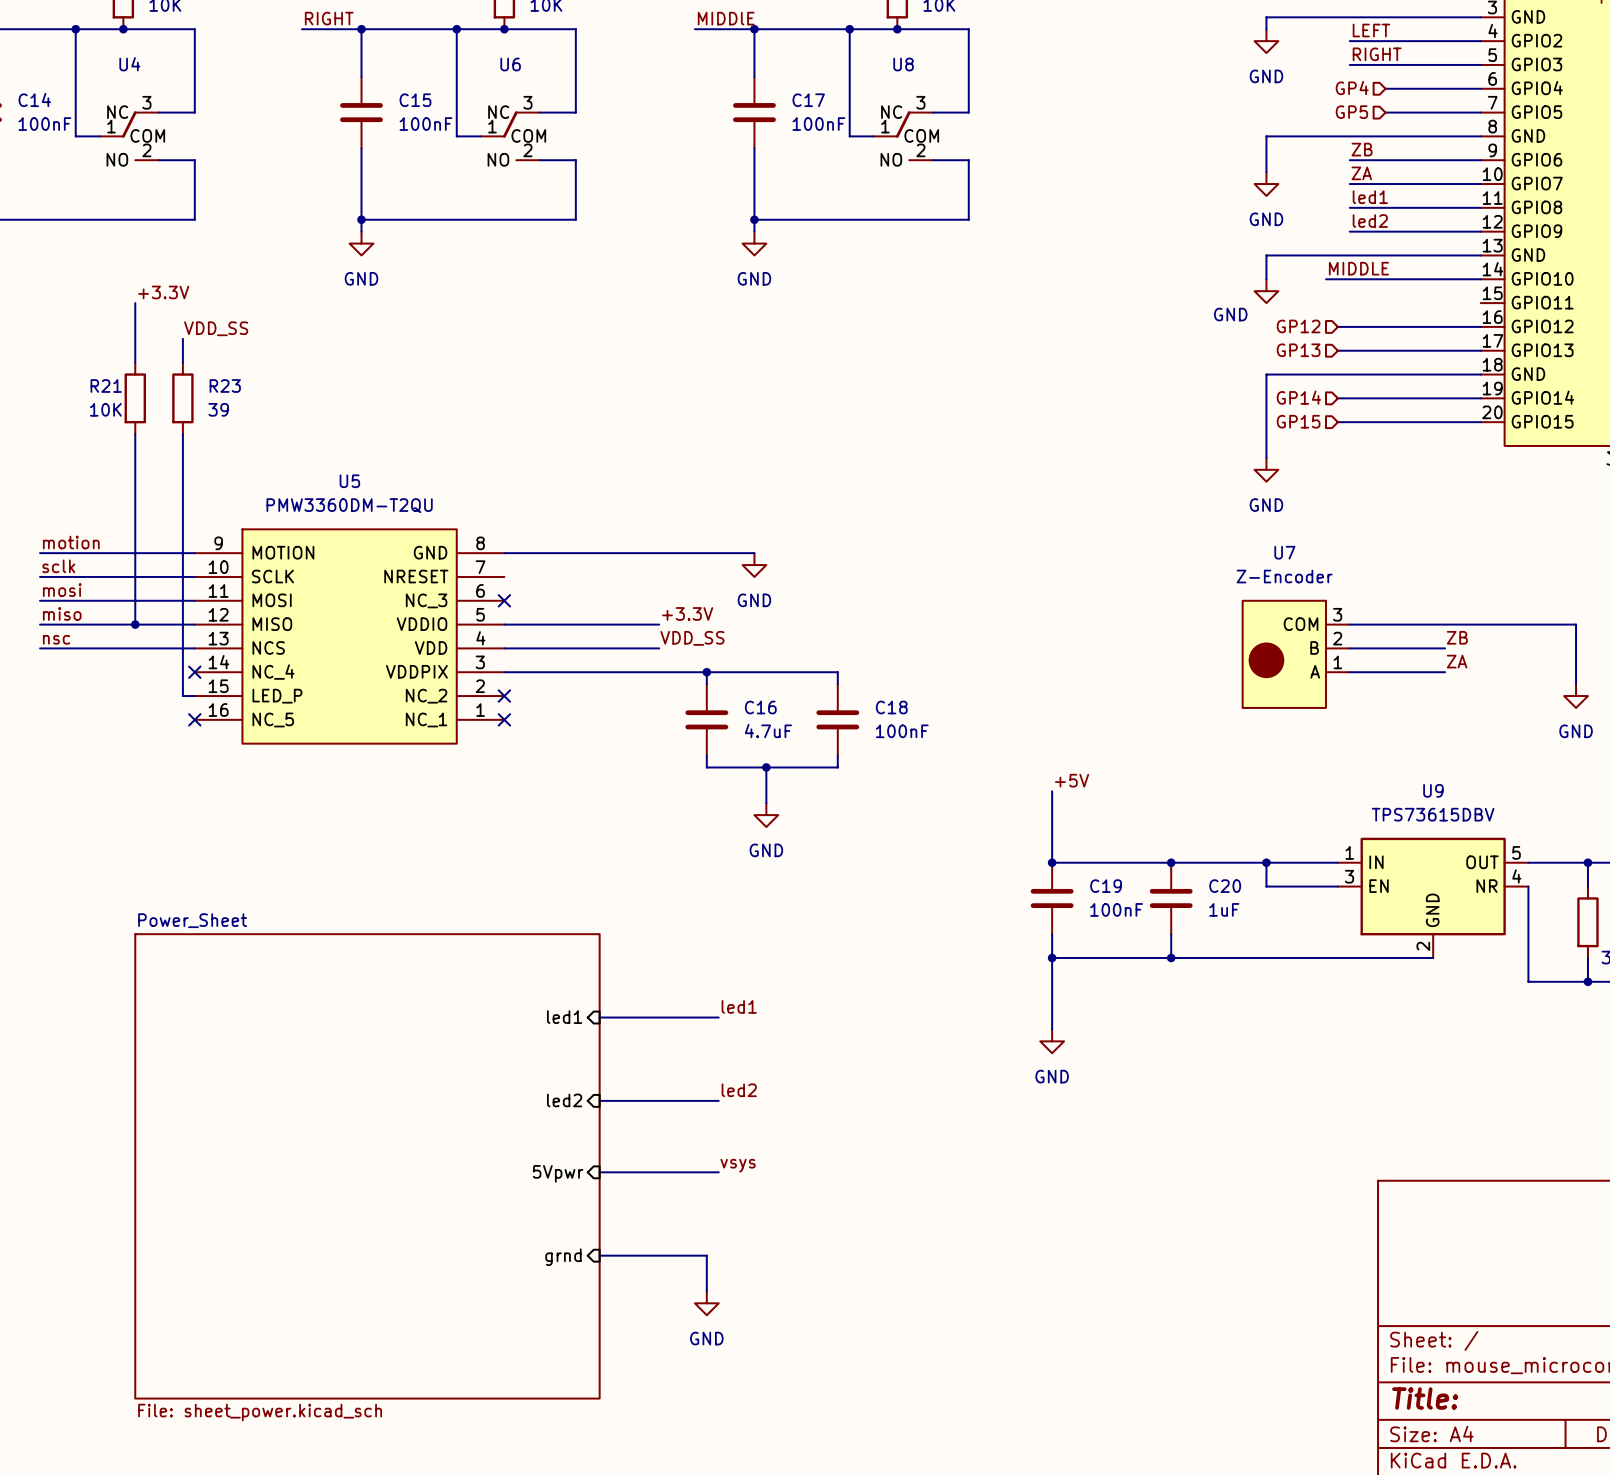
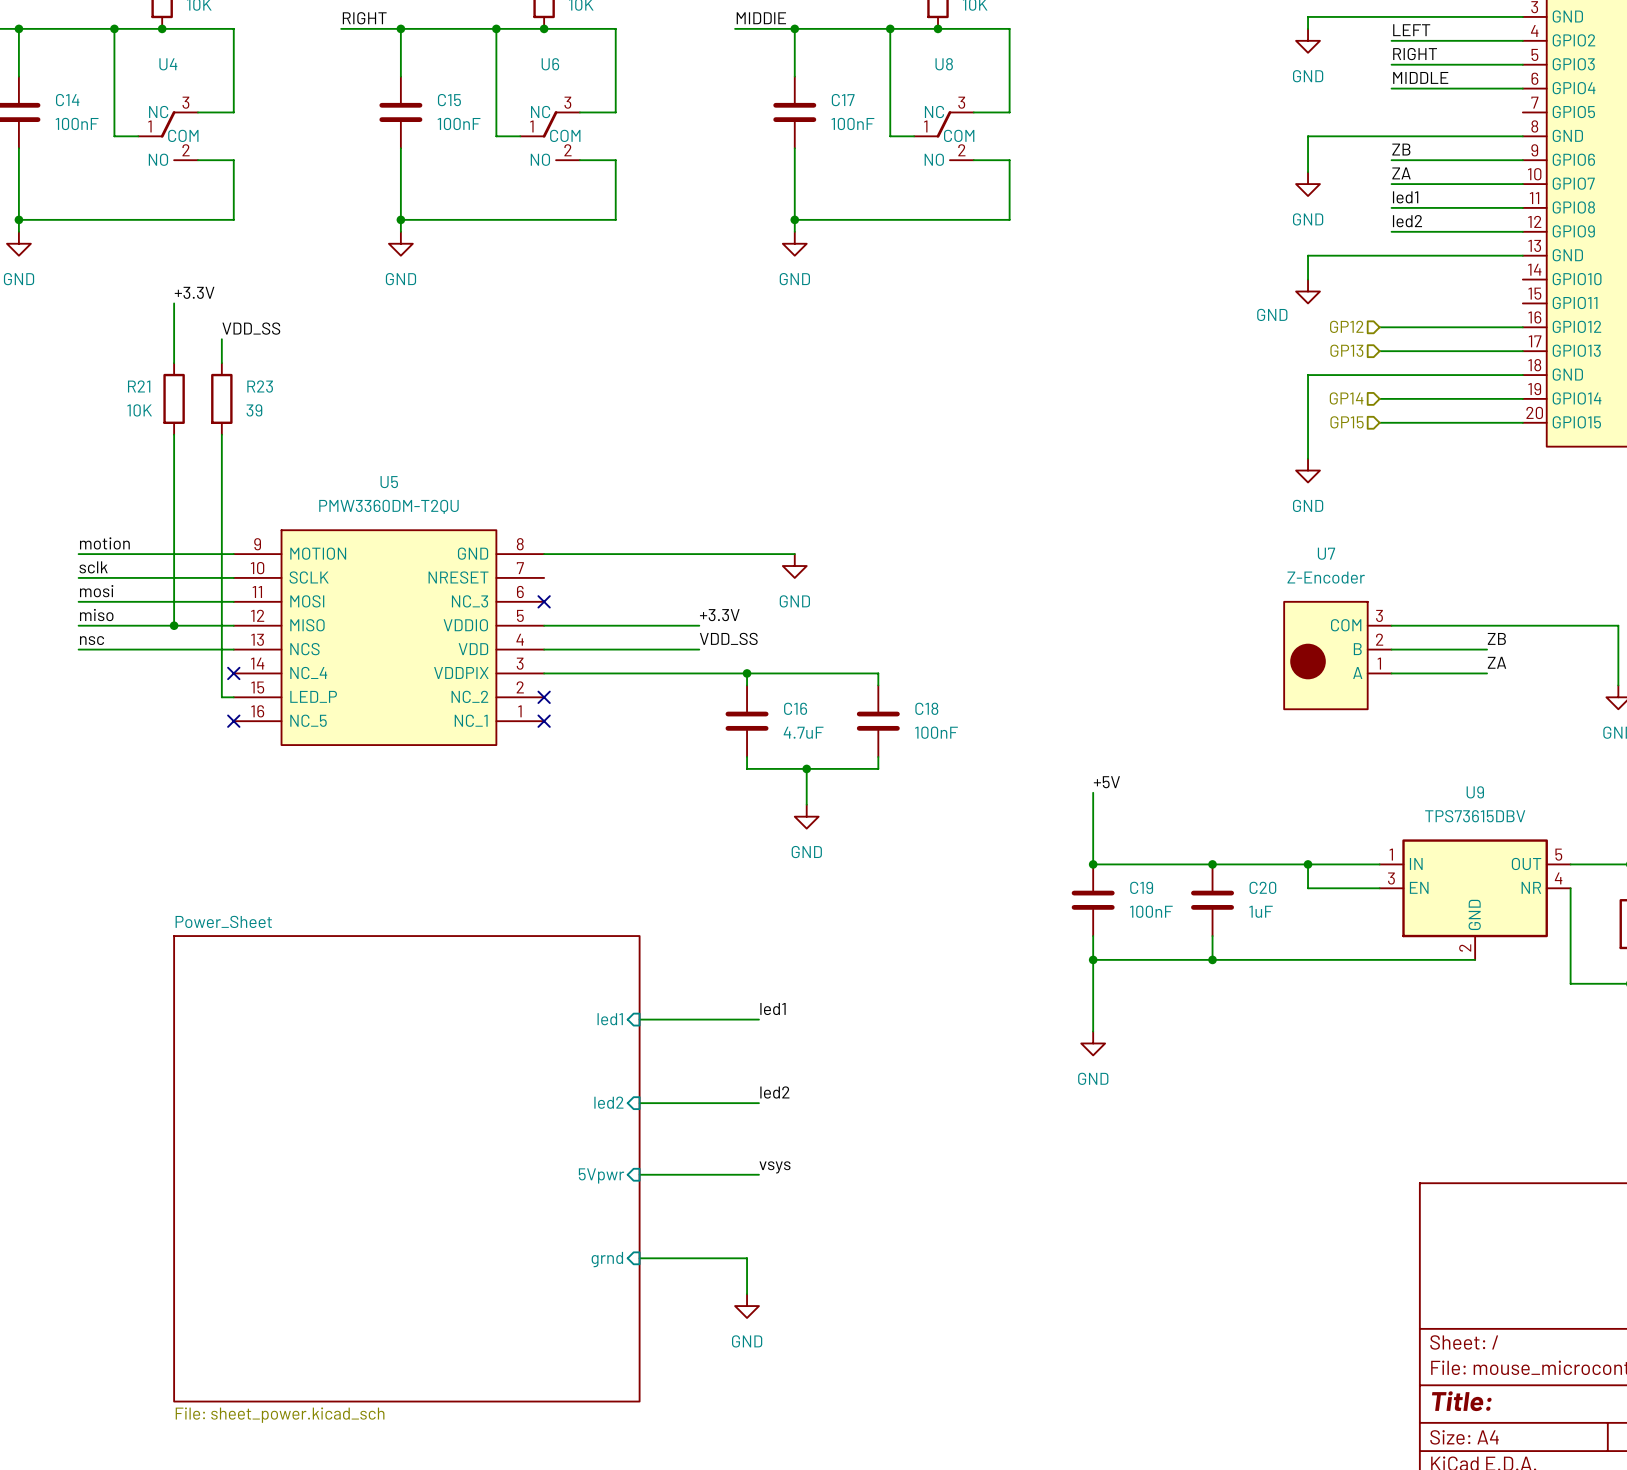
wire: none -> (1391, 88) (1427, 88)
hierarchical label: GP4 (1352, 88) -> none
hierarchical label: GP5 (1351, 112) -> none
wire: (1385, 112) (1480, 112) -> none
label position: MIDDLE (1358, 268) -> MIDDLE (1420, 77)
wire: (1326, 279) (1480, 279) -> none

